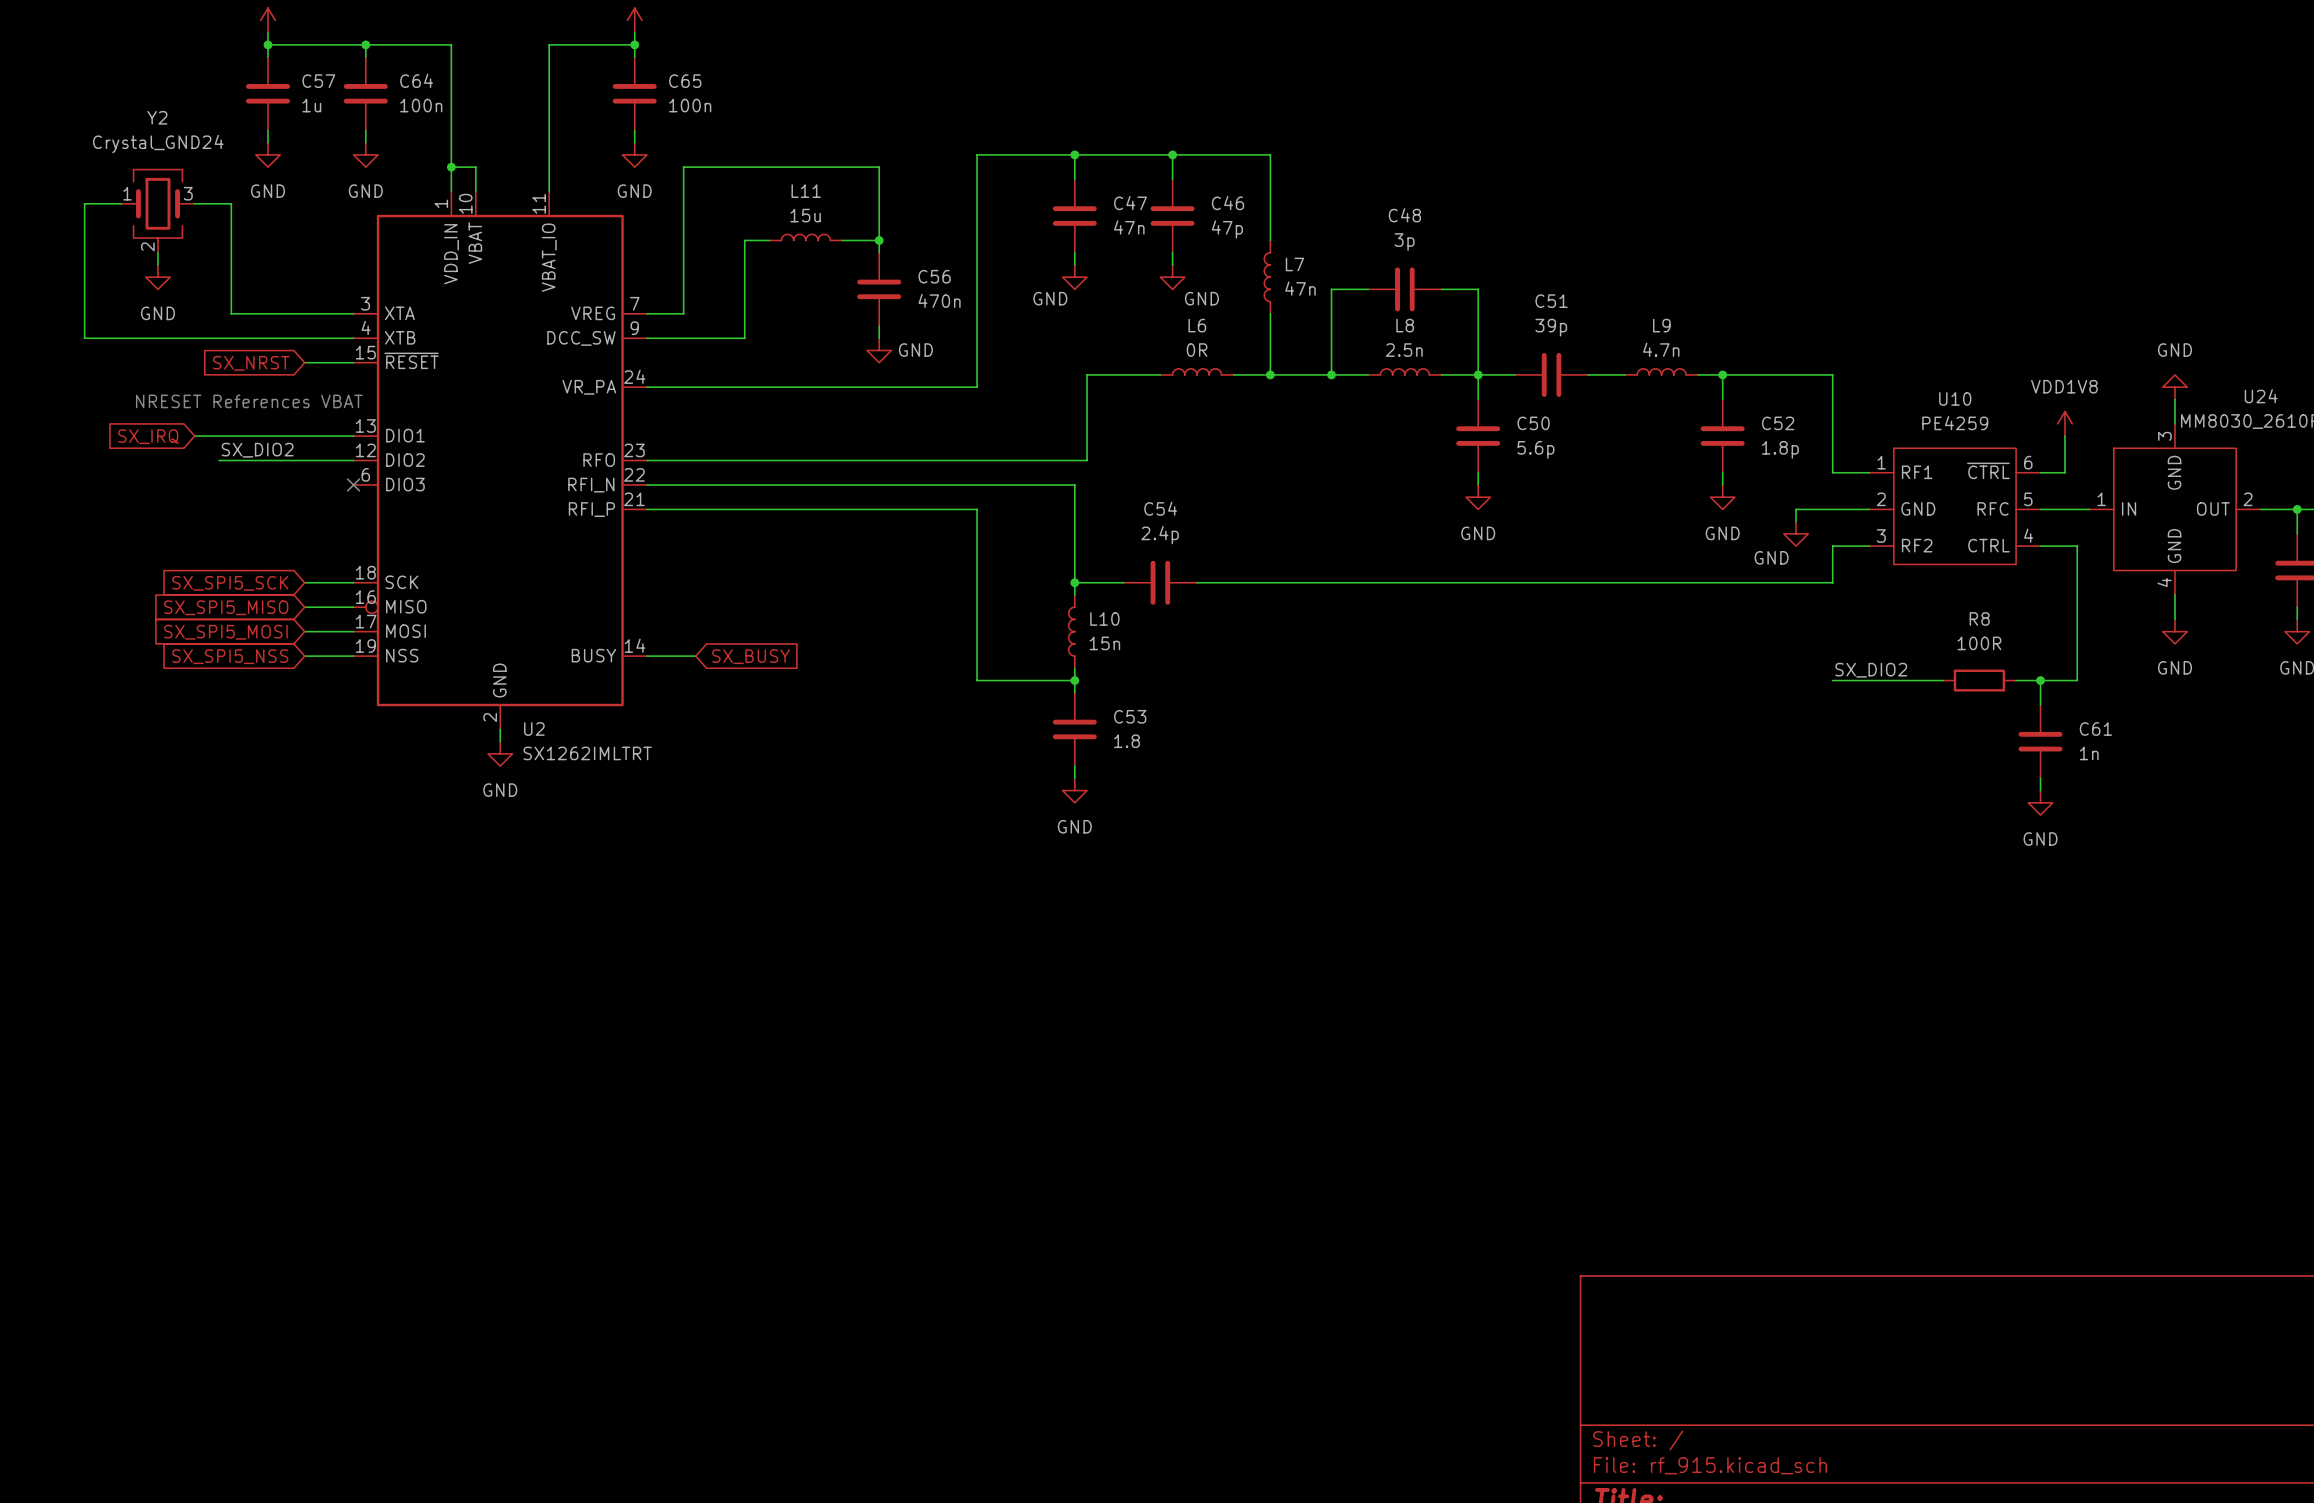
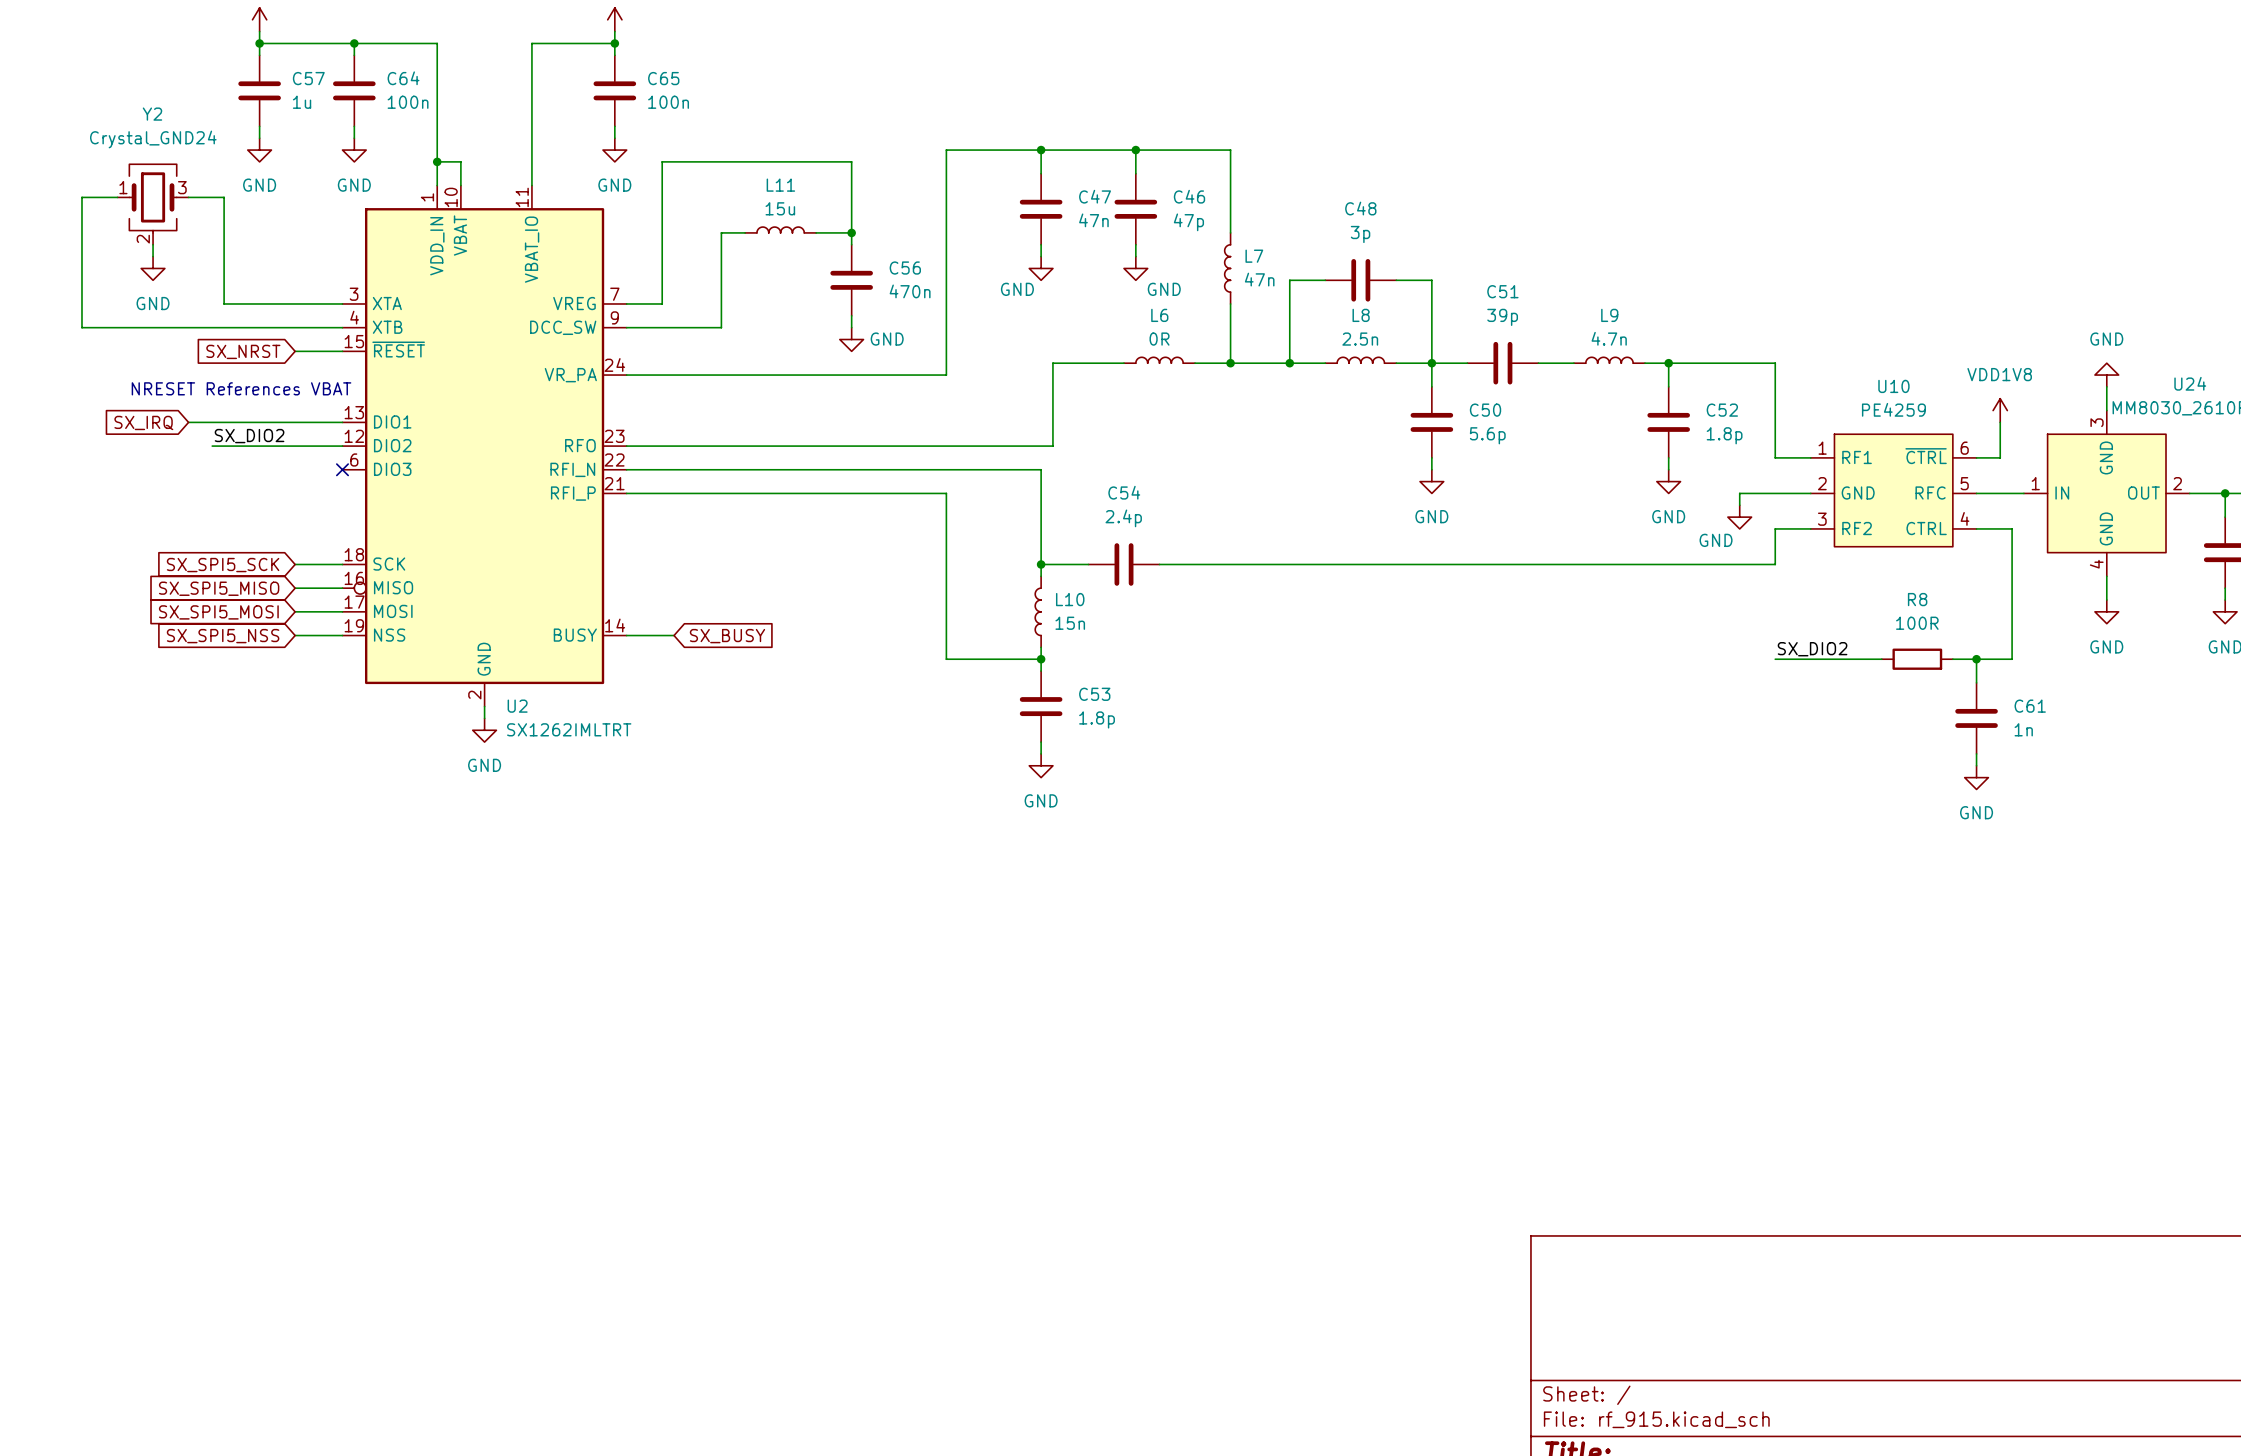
C53 value: 1.8 (1127, 741) -> 1.8p (1097, 719)

